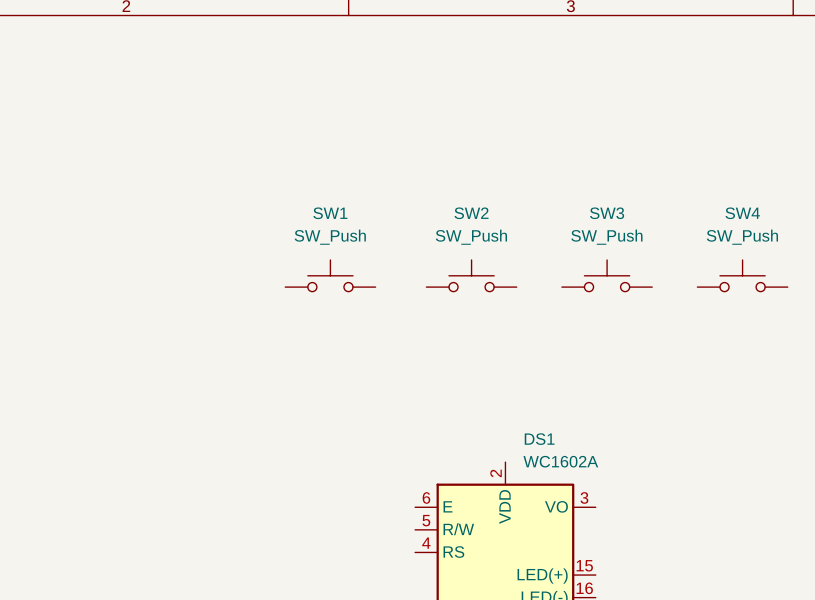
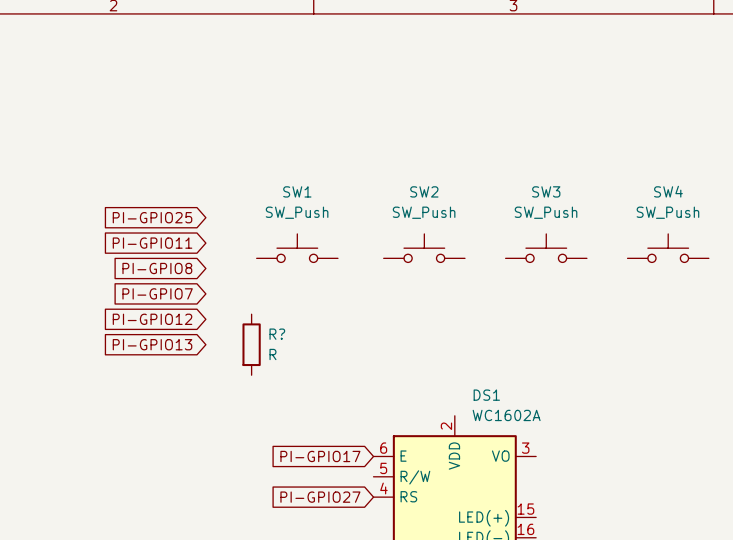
global label: none -> PI-GPIO25 (152, 217)
global label: none -> PI-GPIO11 (152, 243)
global label: none -> PI-GPIO8 (157, 268)
global label: none -> PI-GPIO7 (157, 293)
global label: none -> PI-GPIO12 (152, 319)
global label: none -> PI-GPIO13 (152, 344)
R?: none -> R (251, 344)
global label: none -> PI-GPIO17 (320, 456)
global label: none -> PI-GPIO27 (320, 497)

